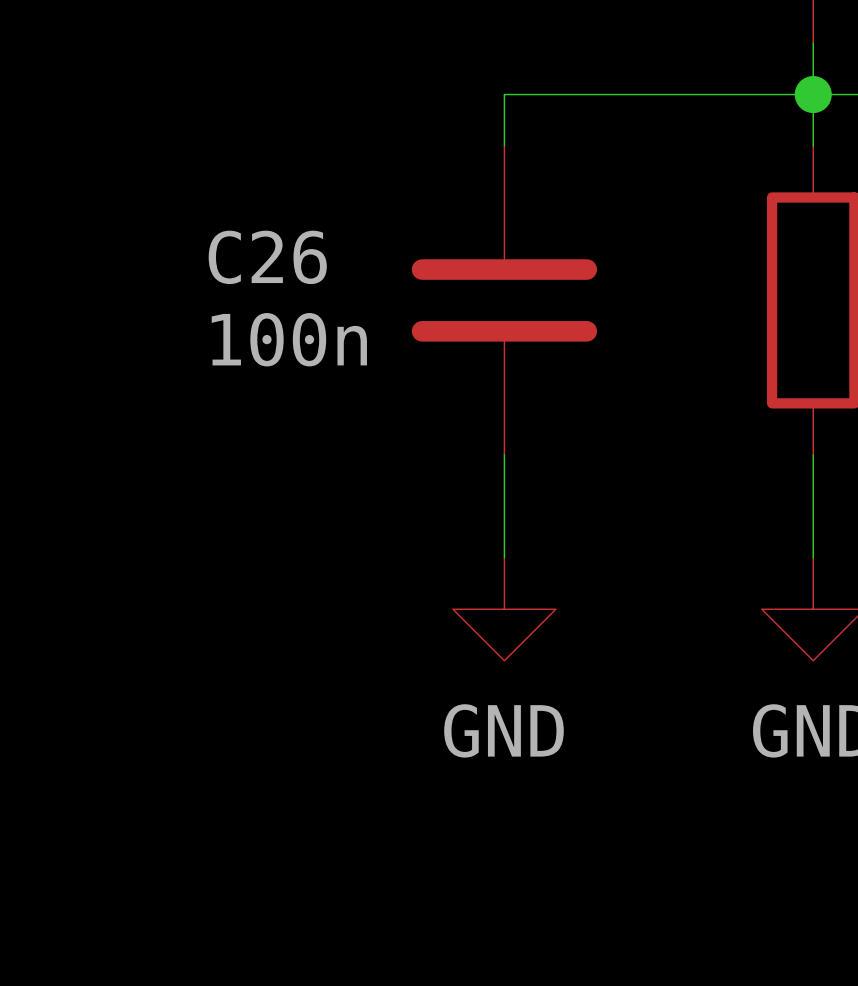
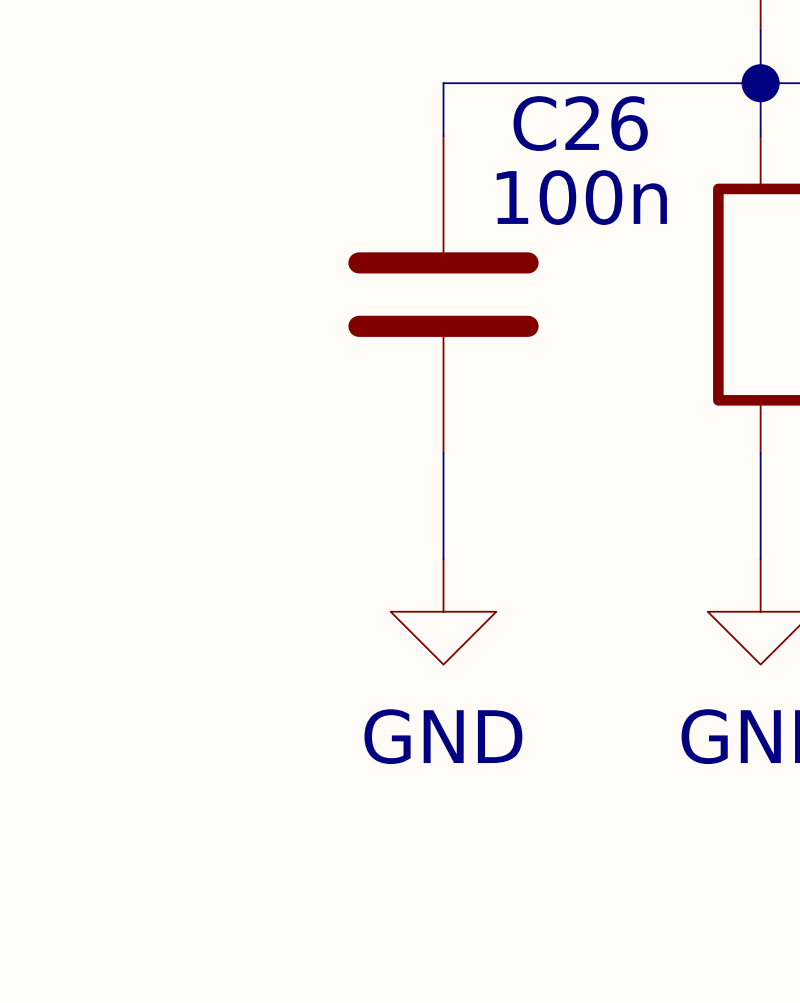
C26 name position: C26 (267, 257) -> C26 (580, 123)
C26 value position: 100n (289, 339) -> 100n (581, 197)

